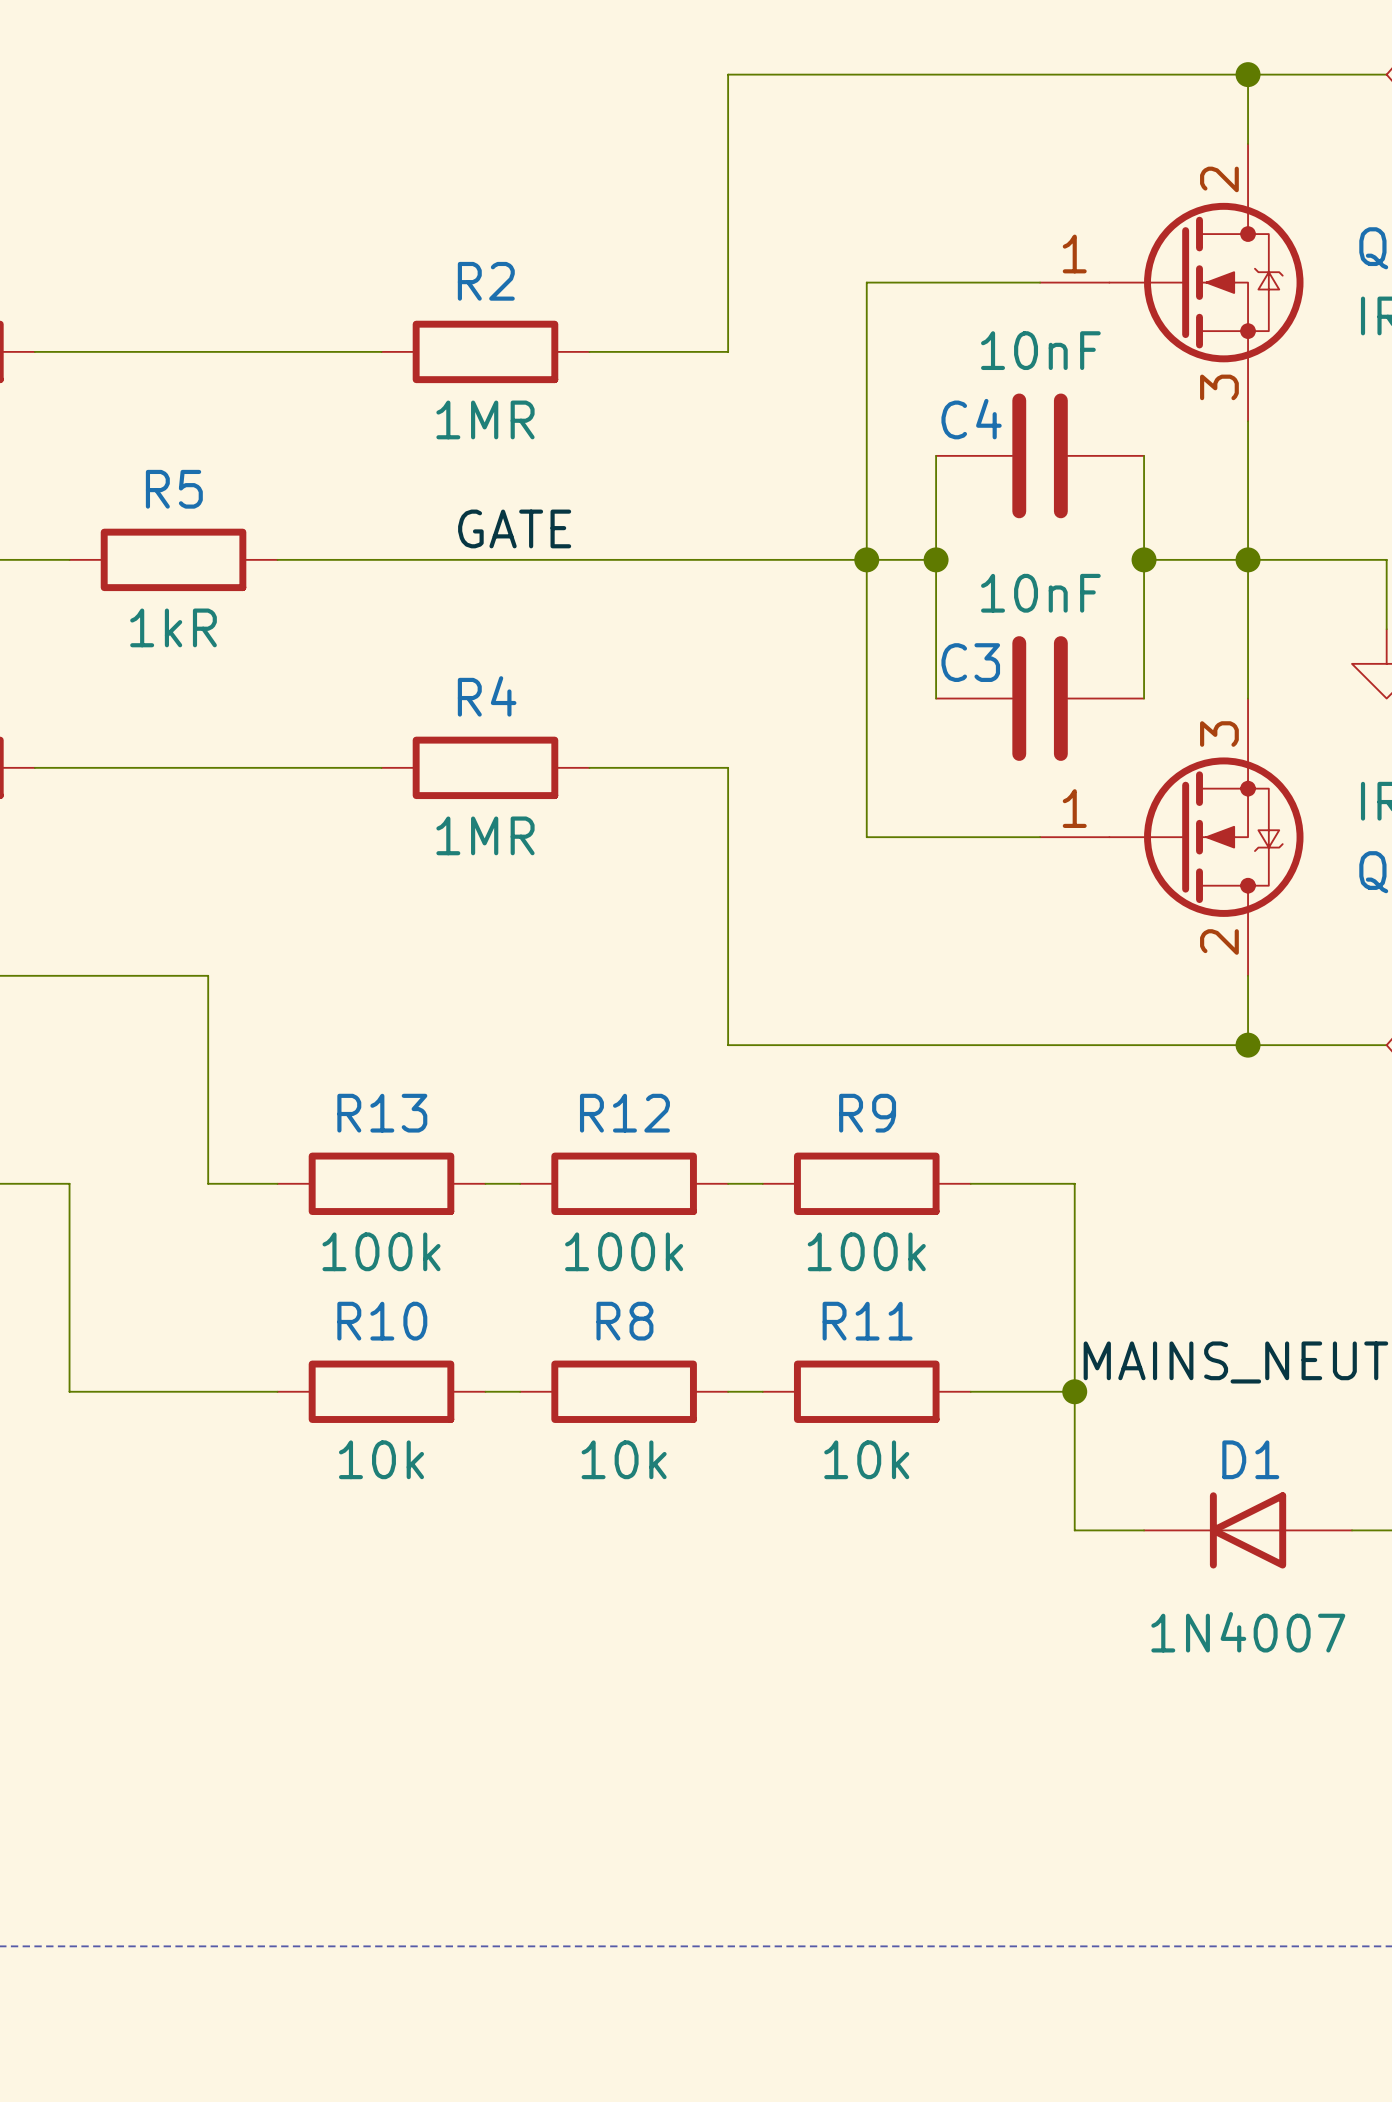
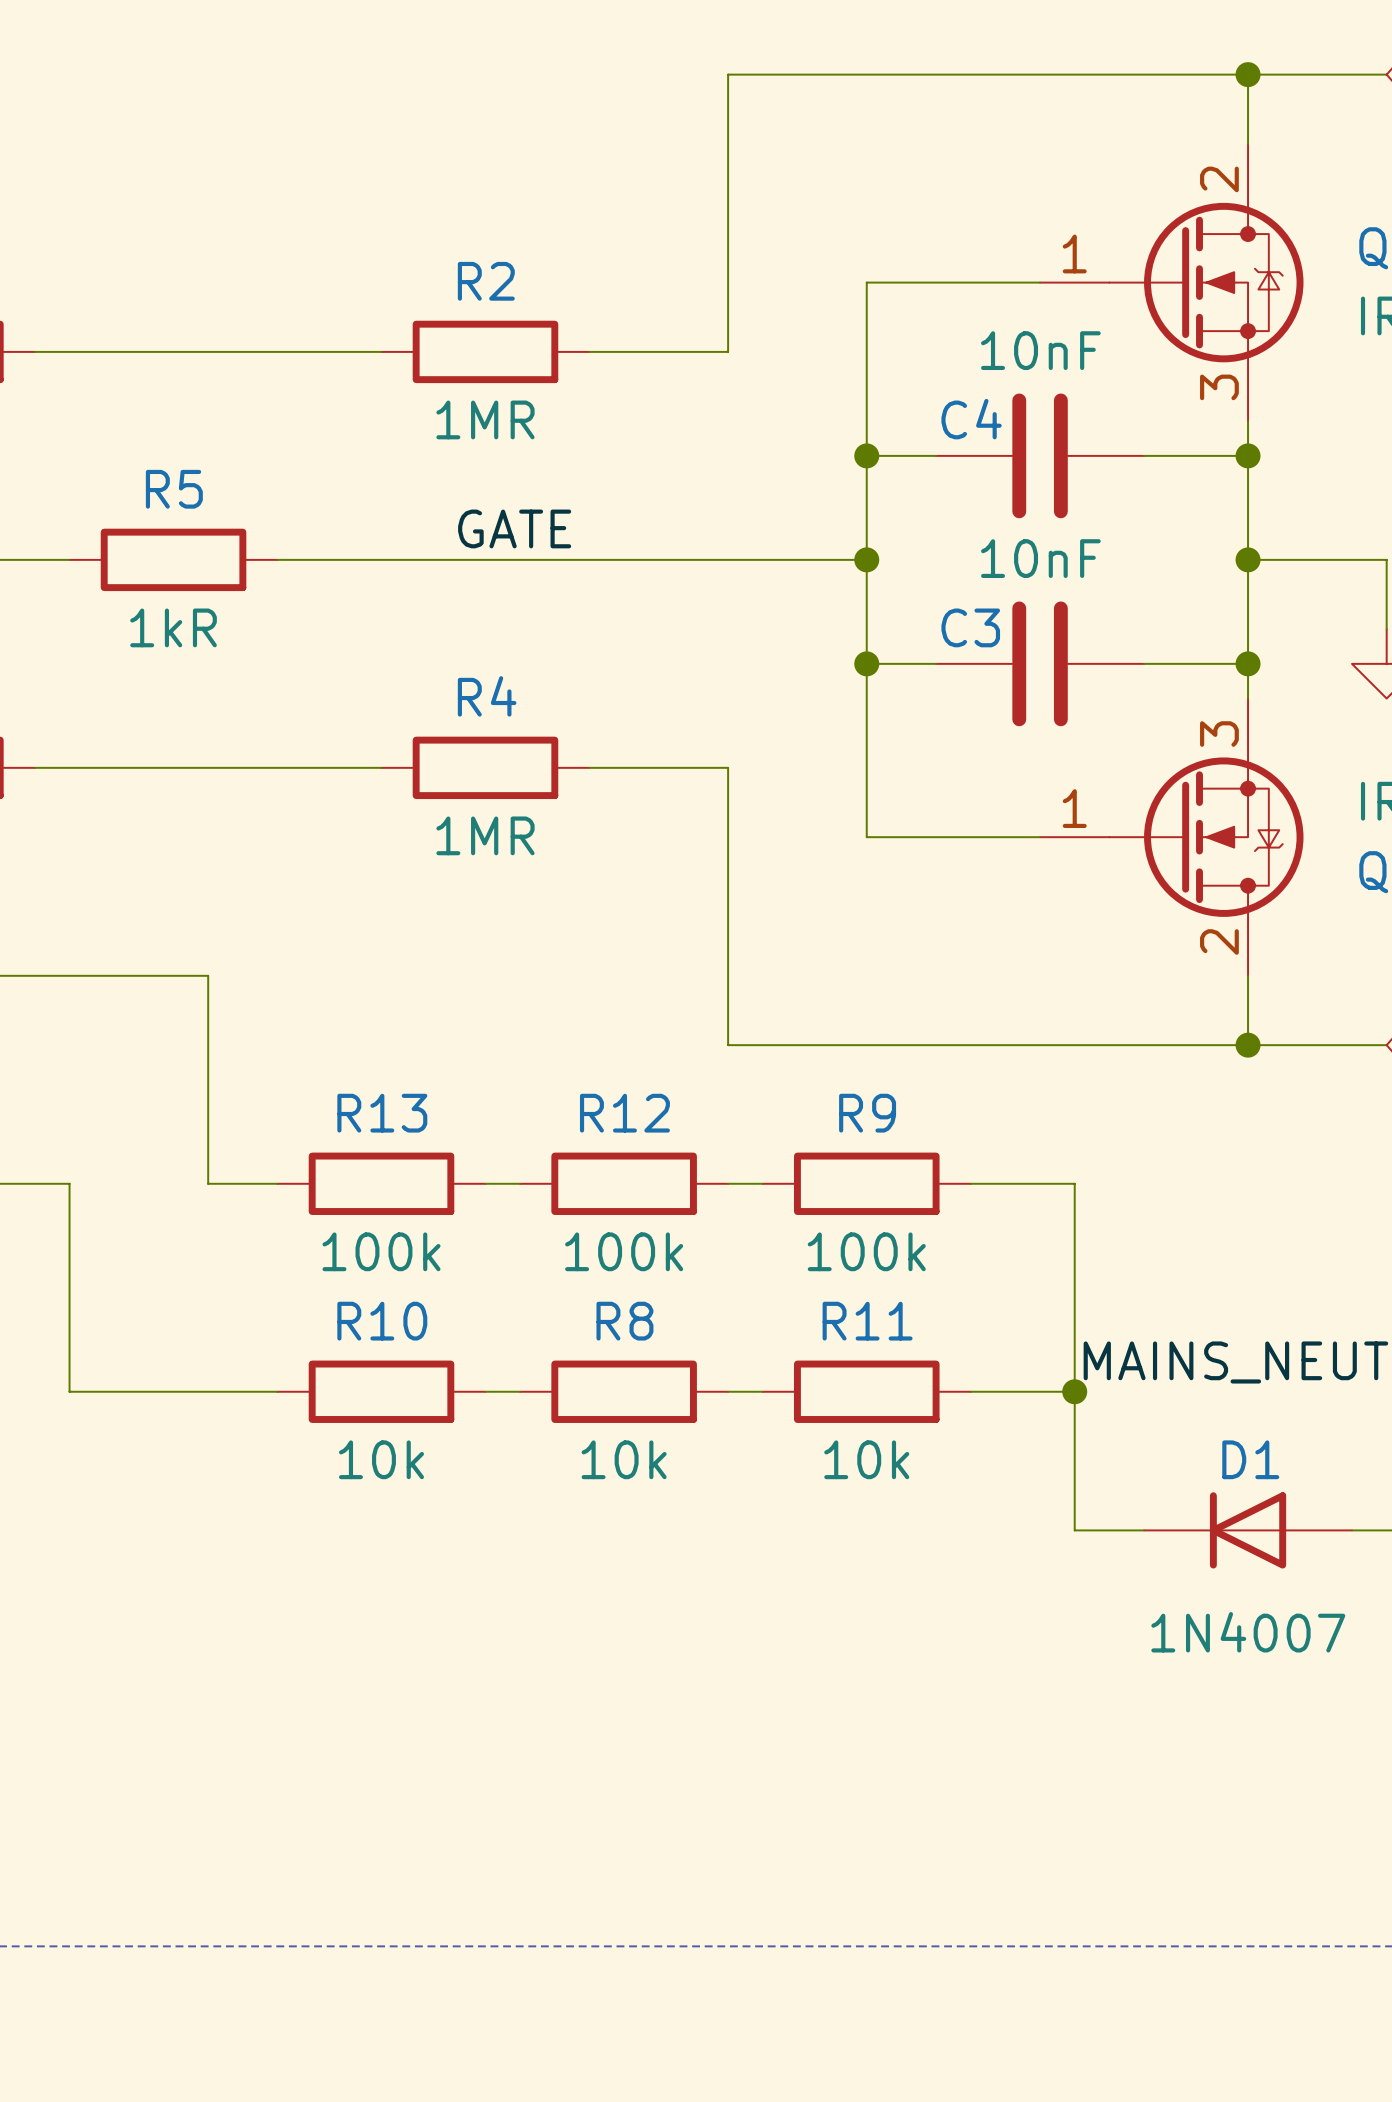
junction: none -> (866, 455)
wire: (936, 455) (936, 698) -> (936, 455) (866, 455)
wire: (1144, 455) (1144, 698) -> (1144, 455) (1248, 455)
junction: none -> (1248, 455)
wire: (866, 559) (936, 559) -> (866, 663) (936, 663)
junction: (936, 559) -> none
wire: (1144, 559) (1248, 559) -> (1144, 663) (1248, 663)
junction: (1144, 559) -> none
junction: none -> (866, 663)
junction: none -> (1248, 663)
C3 position: (1040, 698) -> (1040, 663)

